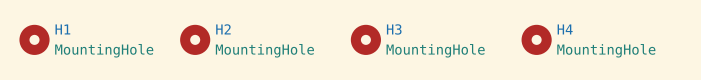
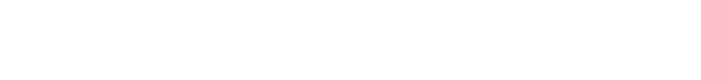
H1: MountingHole (34, 39) -> none
H2: MountingHole (195, 39) -> none
H3: MountingHole (365, 39) -> none
H4: MountingHole (536, 39) -> none

